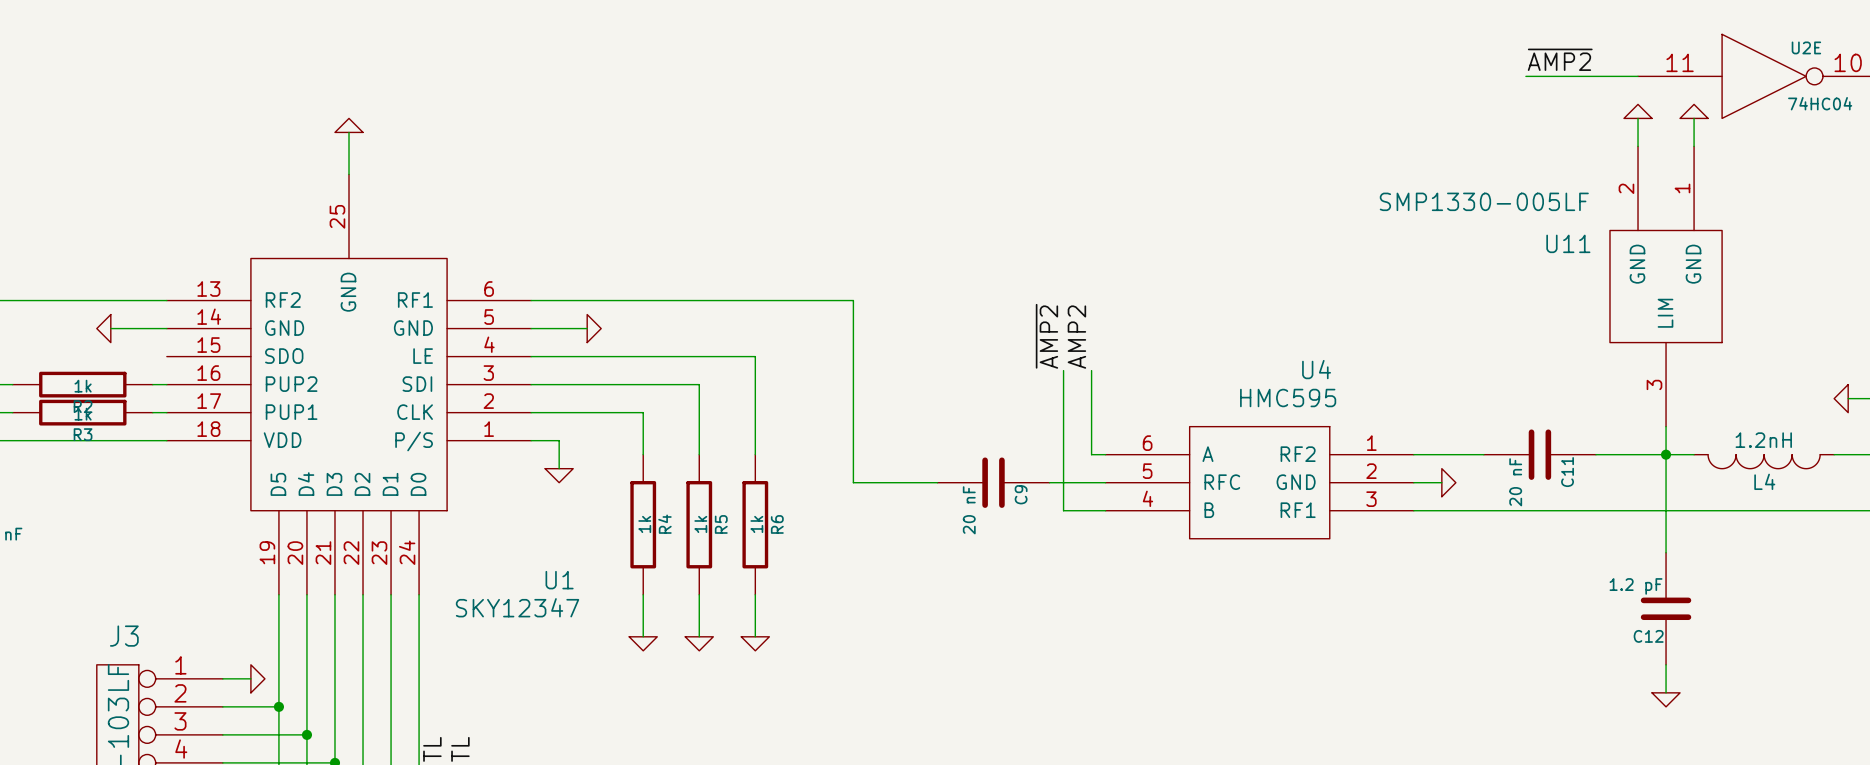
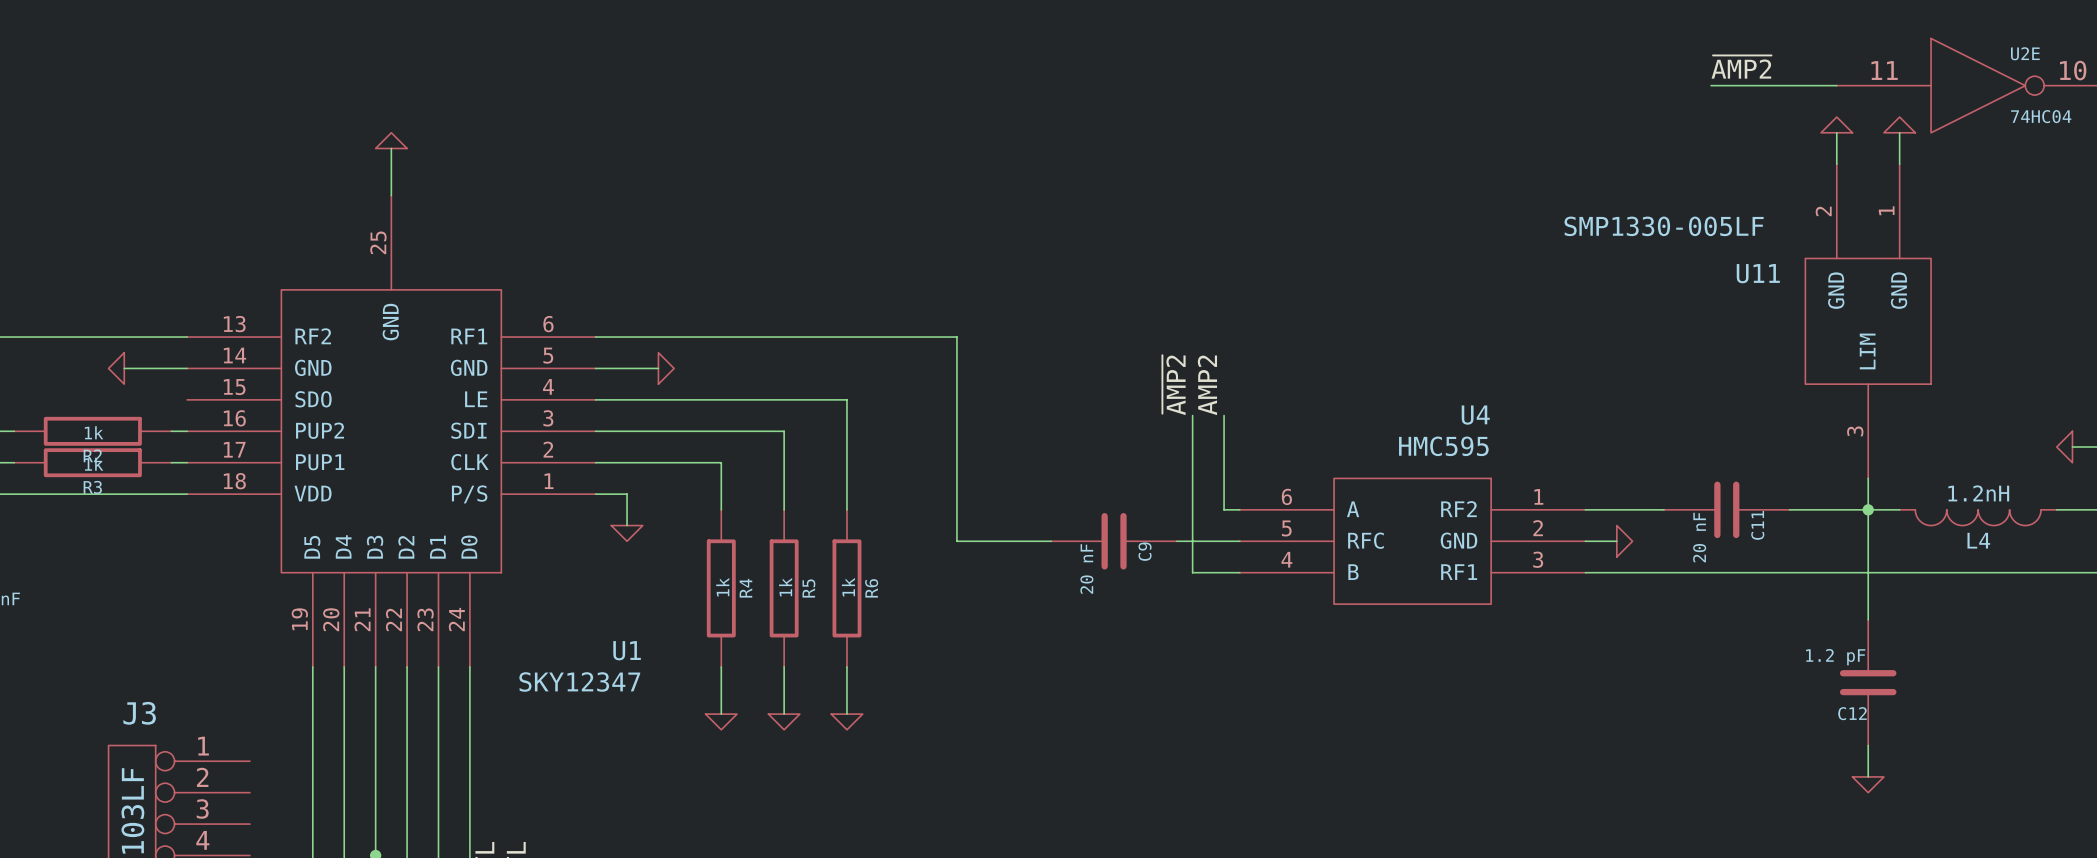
wire: (222, 678) (250, 678) -> none
power symbol: (257, 678) -> none
wire: (222, 706) (278, 706) -> none
junction: (278, 706) -> none
wire: (222, 734) (306, 734) -> none
junction: (306, 734) -> none
wire: (222, 762) (334, 762) -> none

